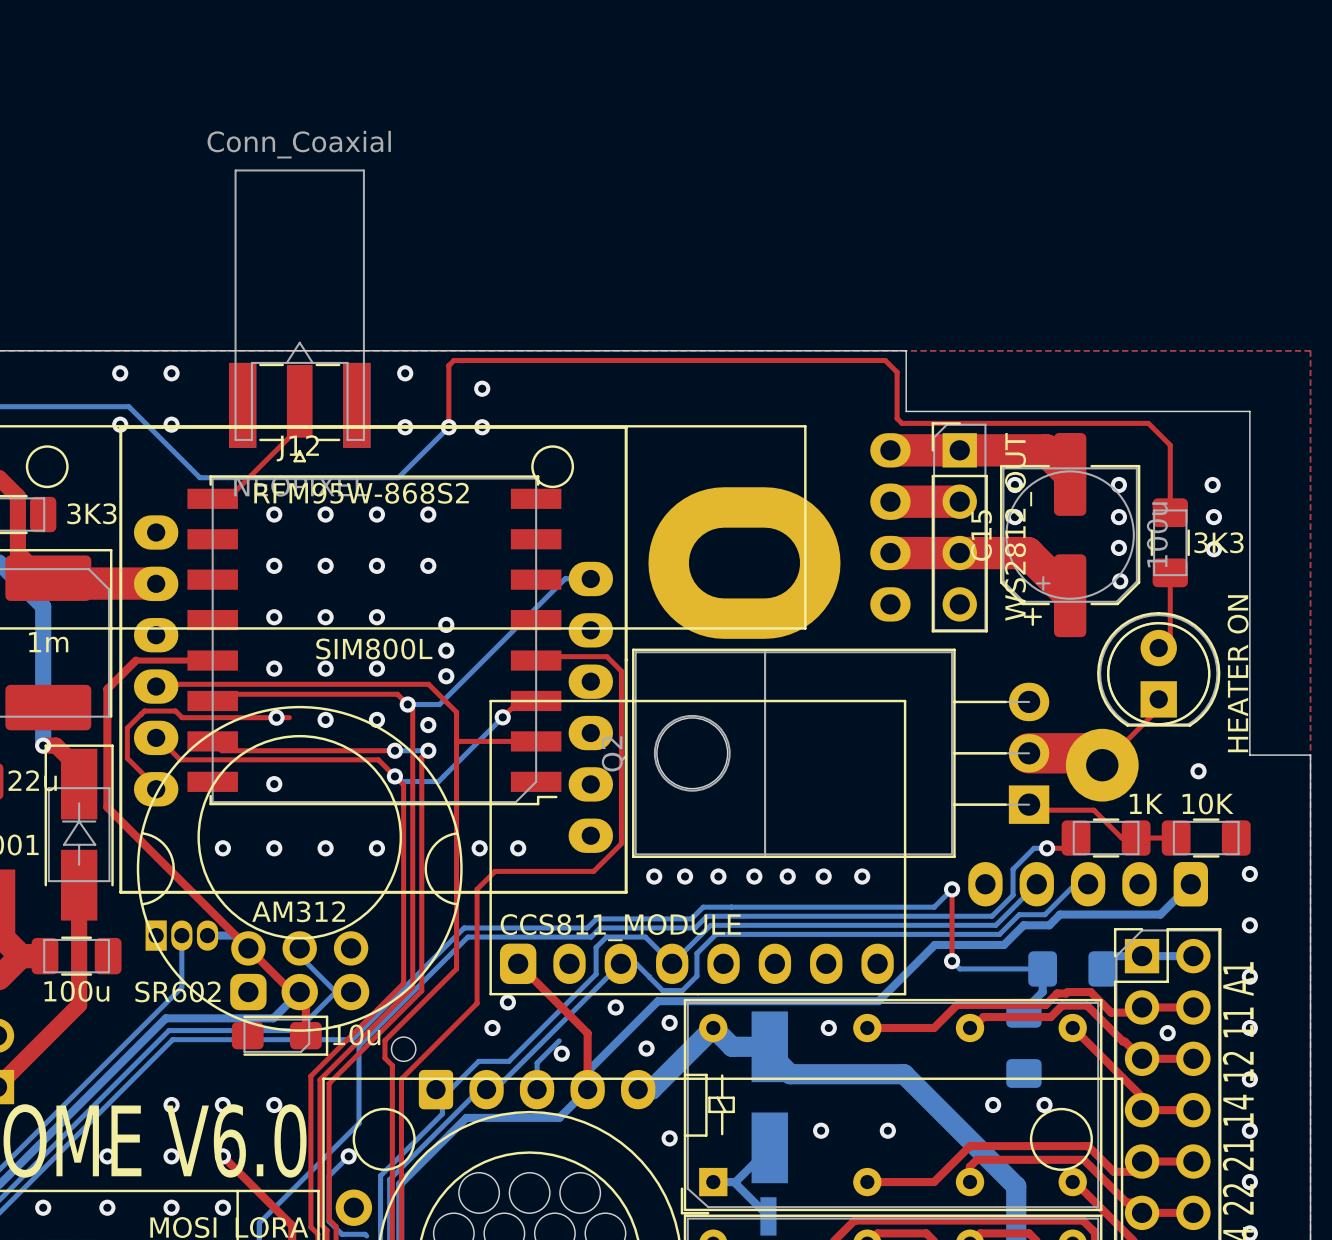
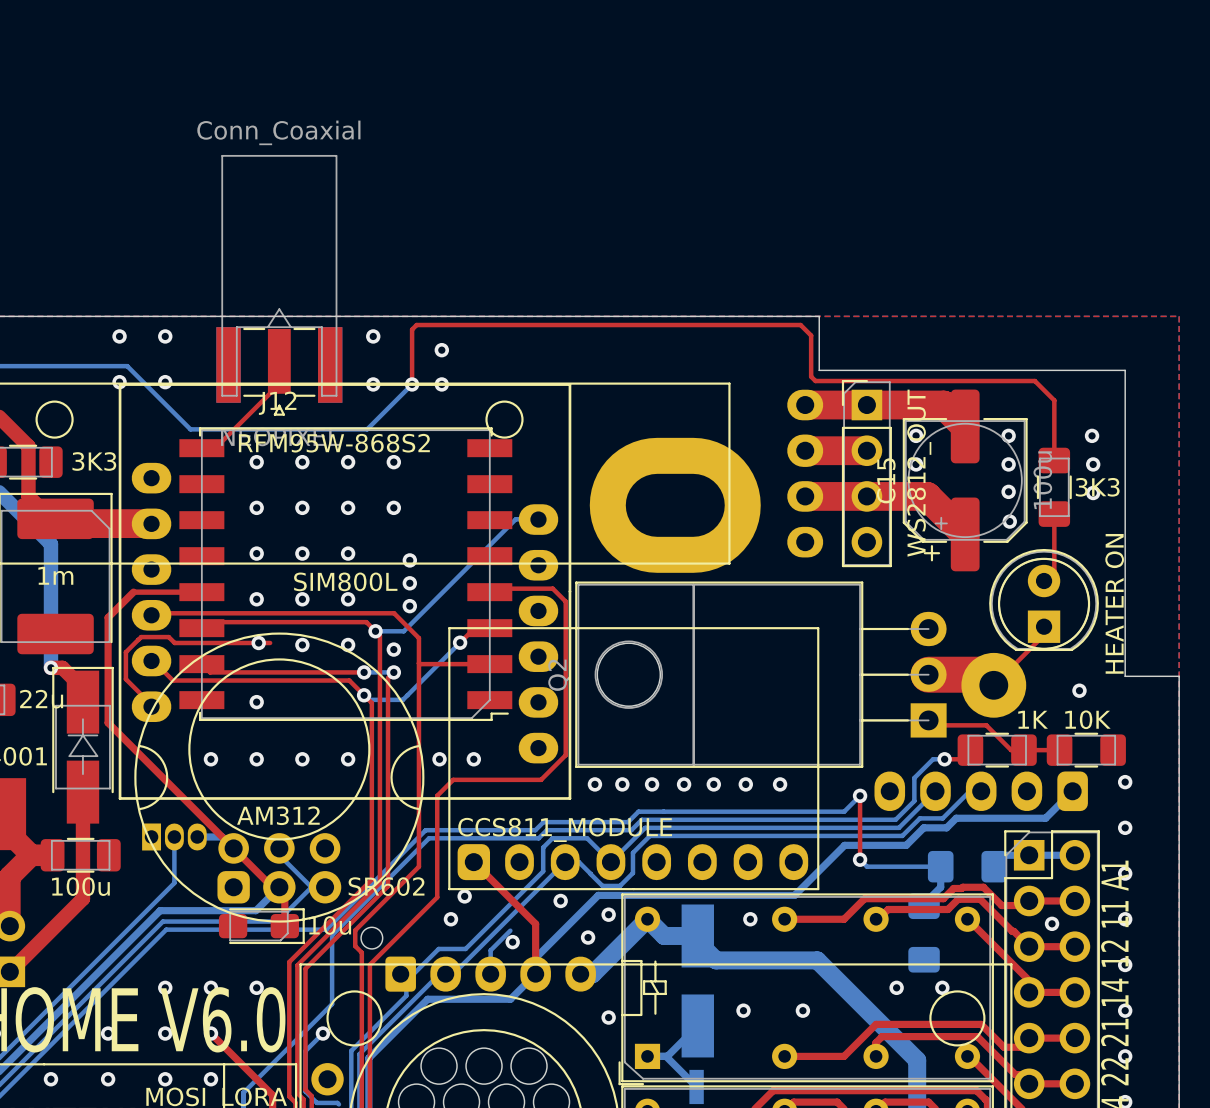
part value position: SR602 (177, 991) -> SR602 (386, 886)

